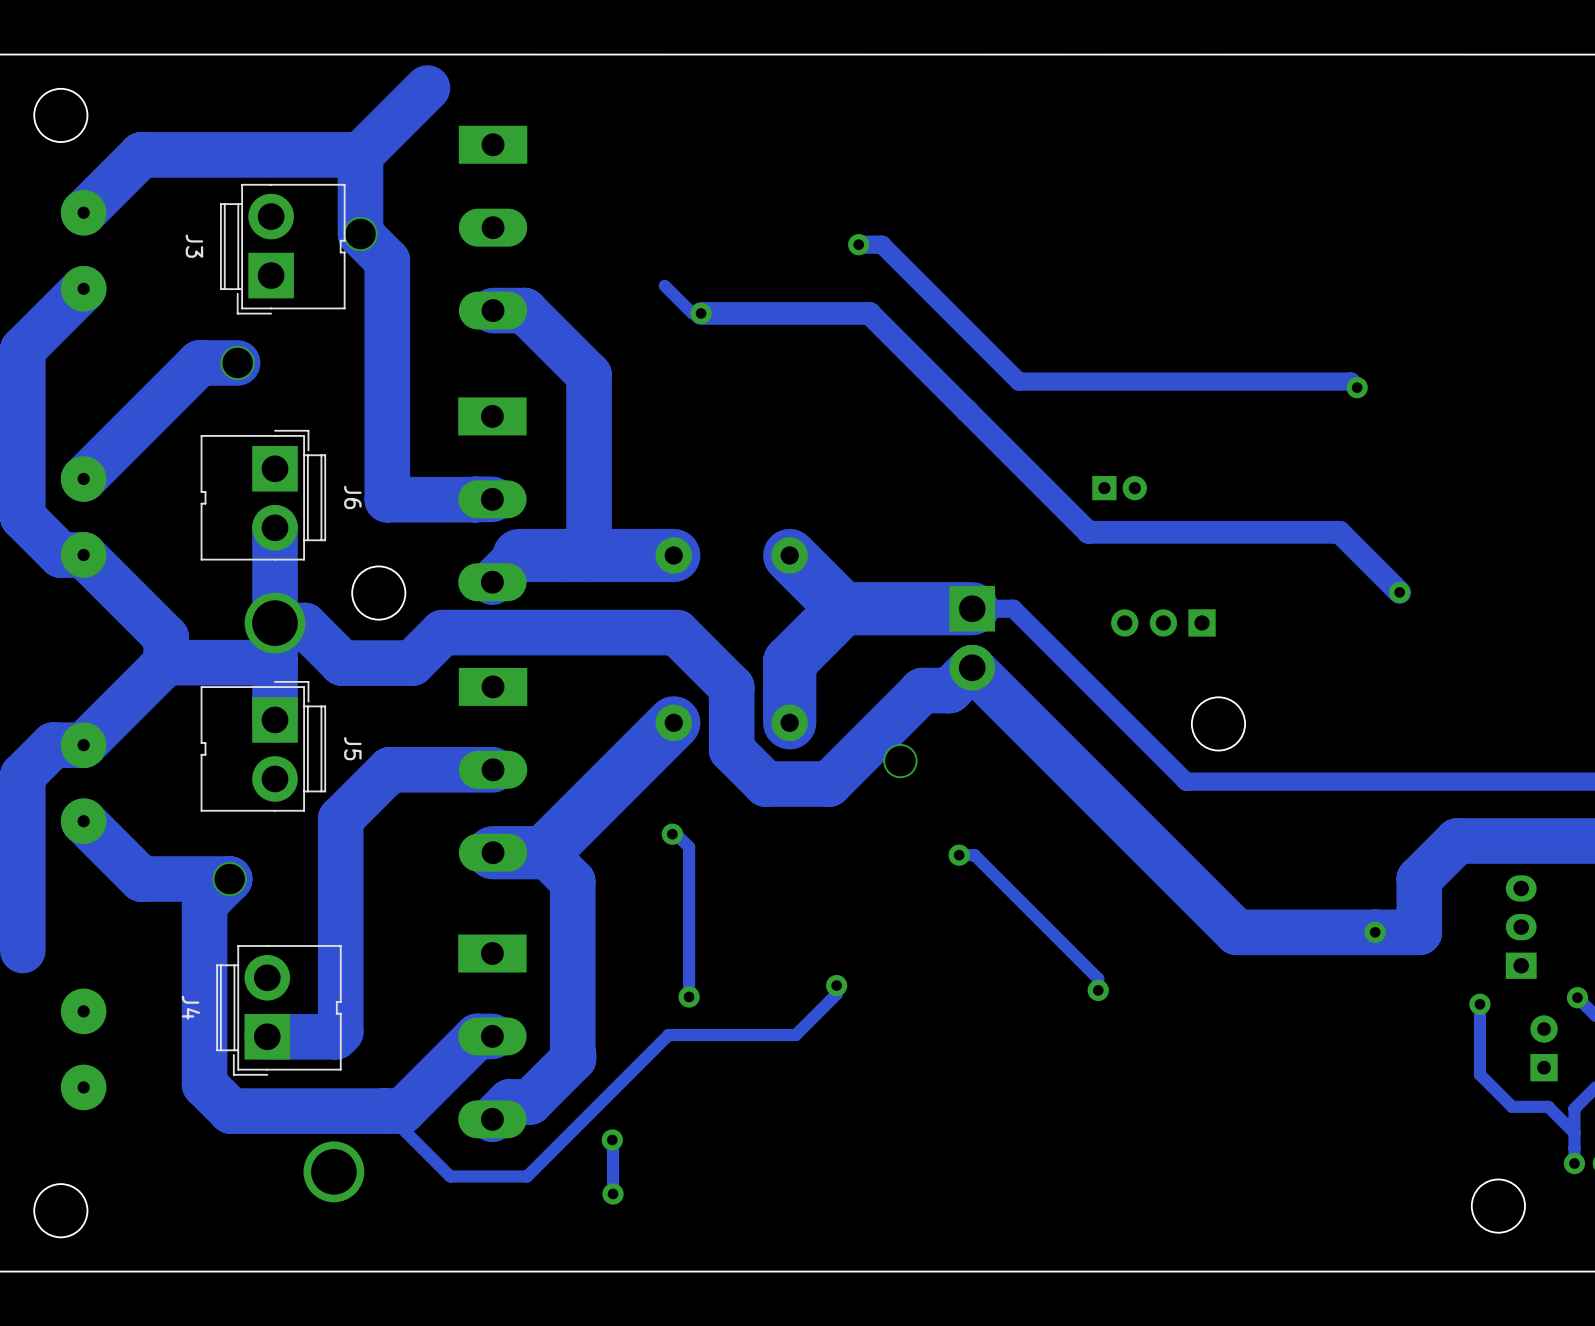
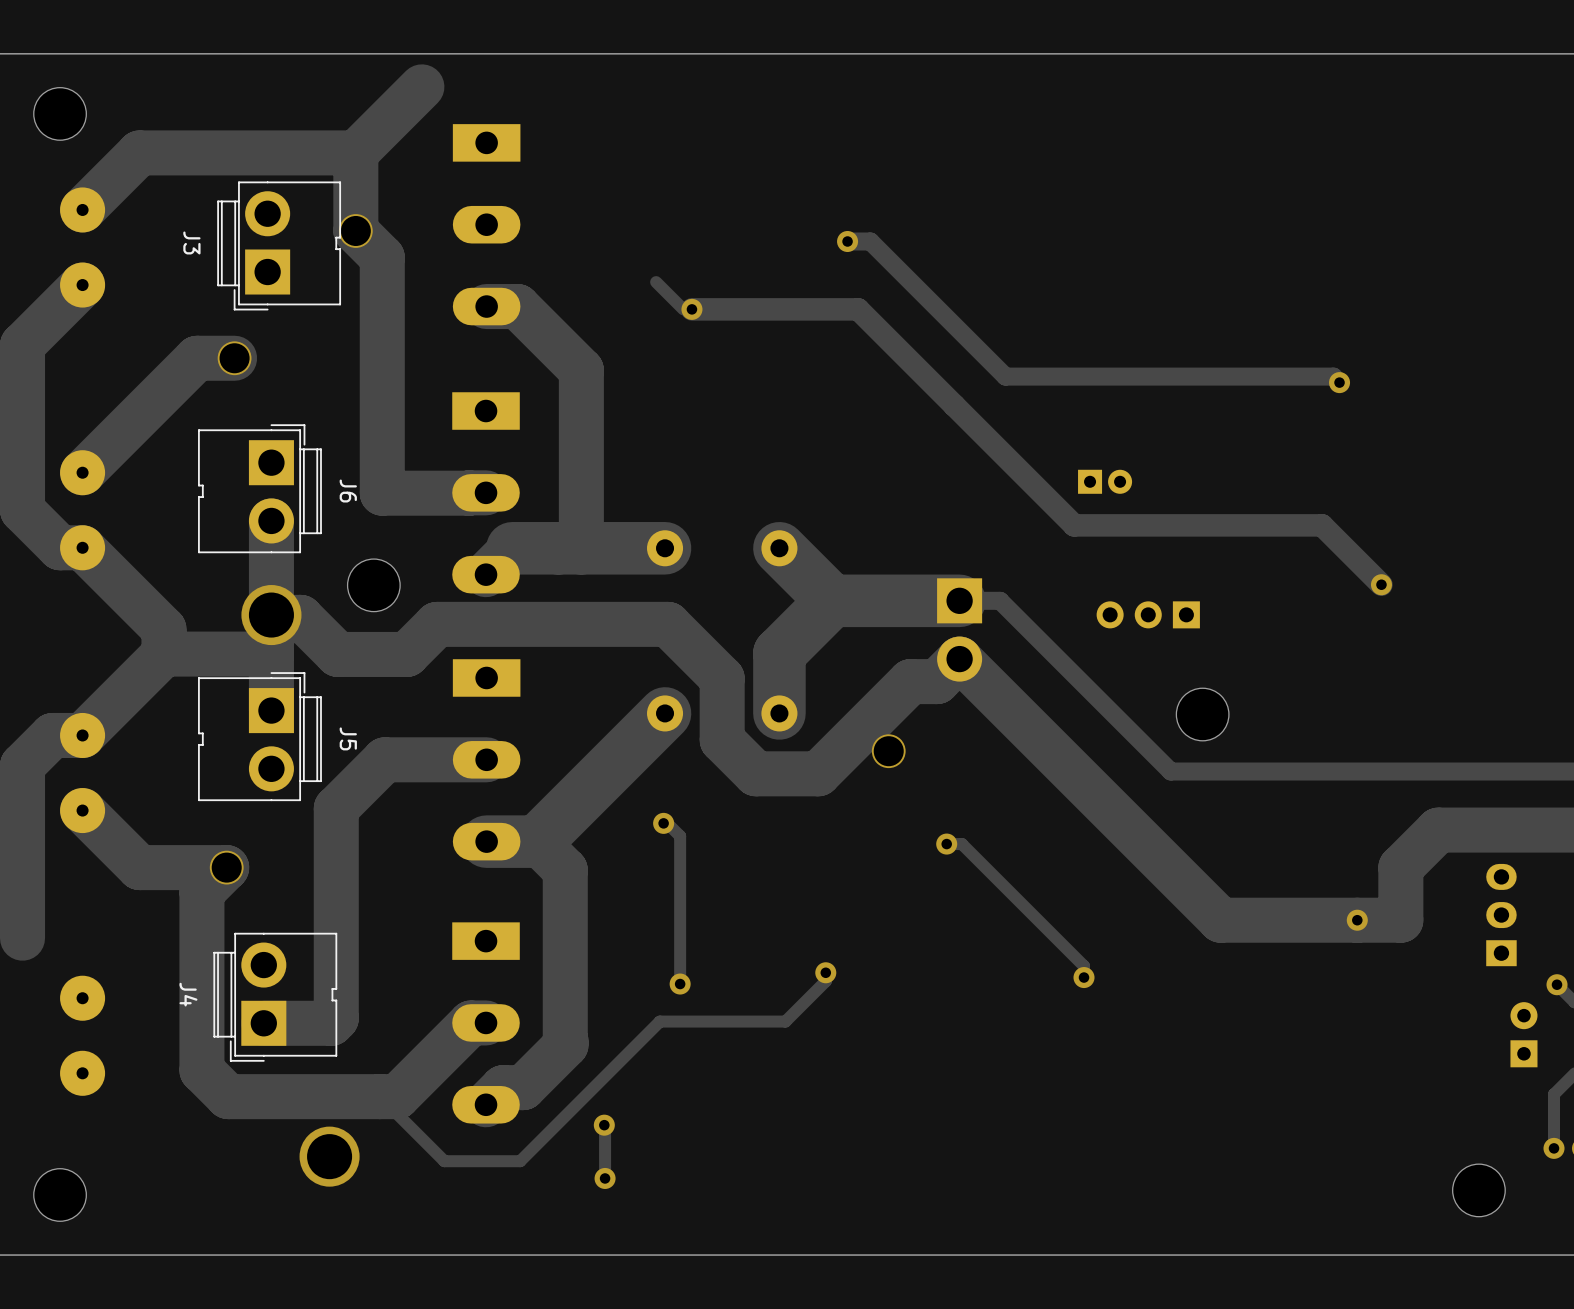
track: (1479, 1004) (1479, 1074) (1512, 1106) (1548, 1106) (1574, 1132) -> none
via: (1479, 1004) -> none

